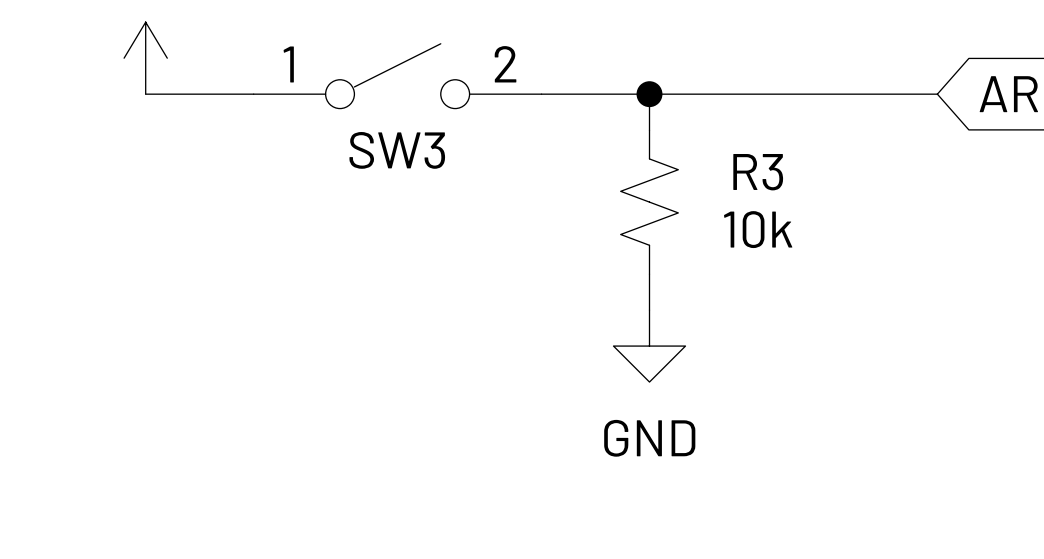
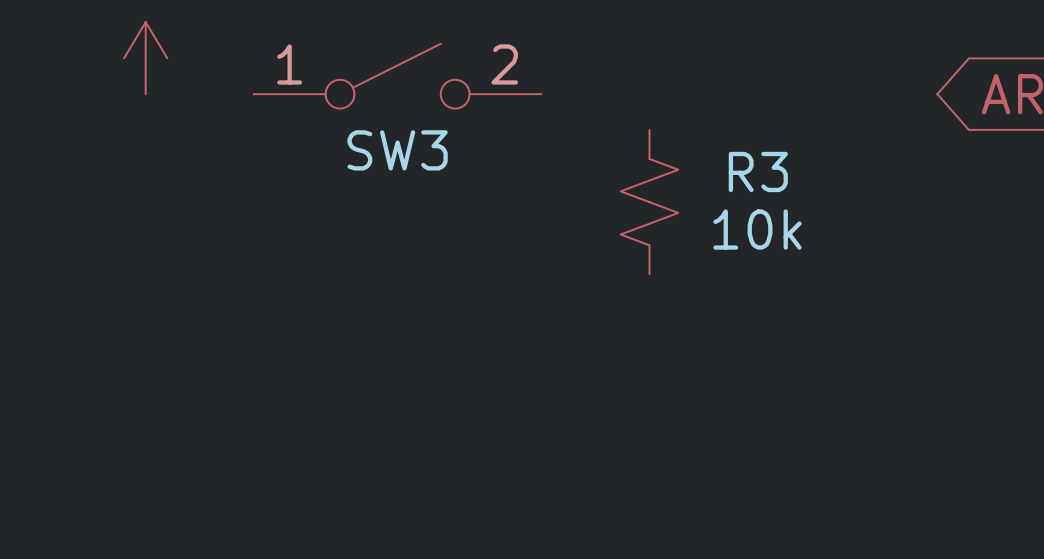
wire: (145, 94) (253, 94) -> none
wire: (541, 94) (937, 94) -> none
wire: (649, 94) (649, 130) -> none
junction: (649, 94) -> none
wire: (649, 274) (649, 310) -> none
power symbol: GND (649, 346) -> none

